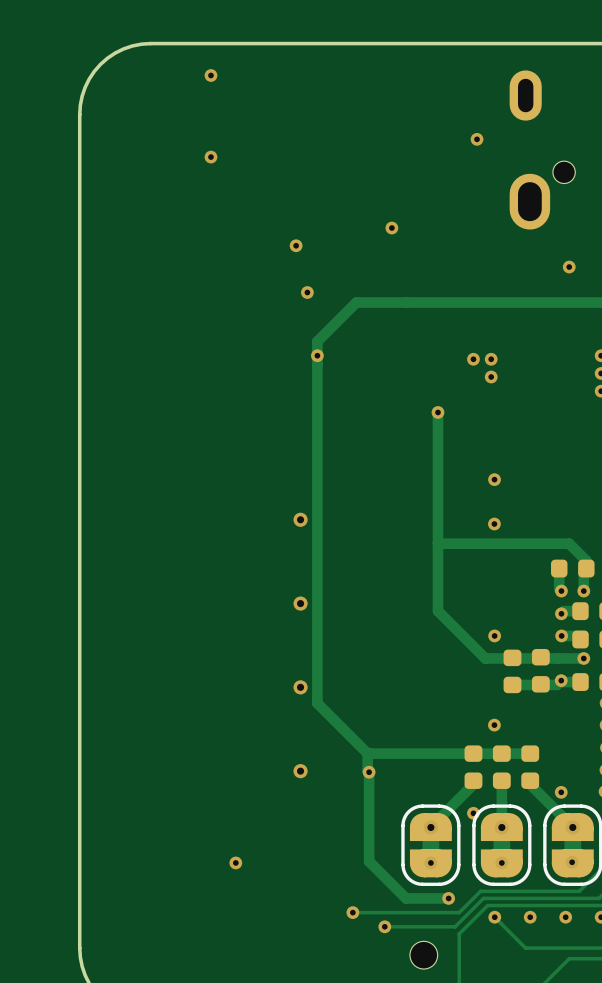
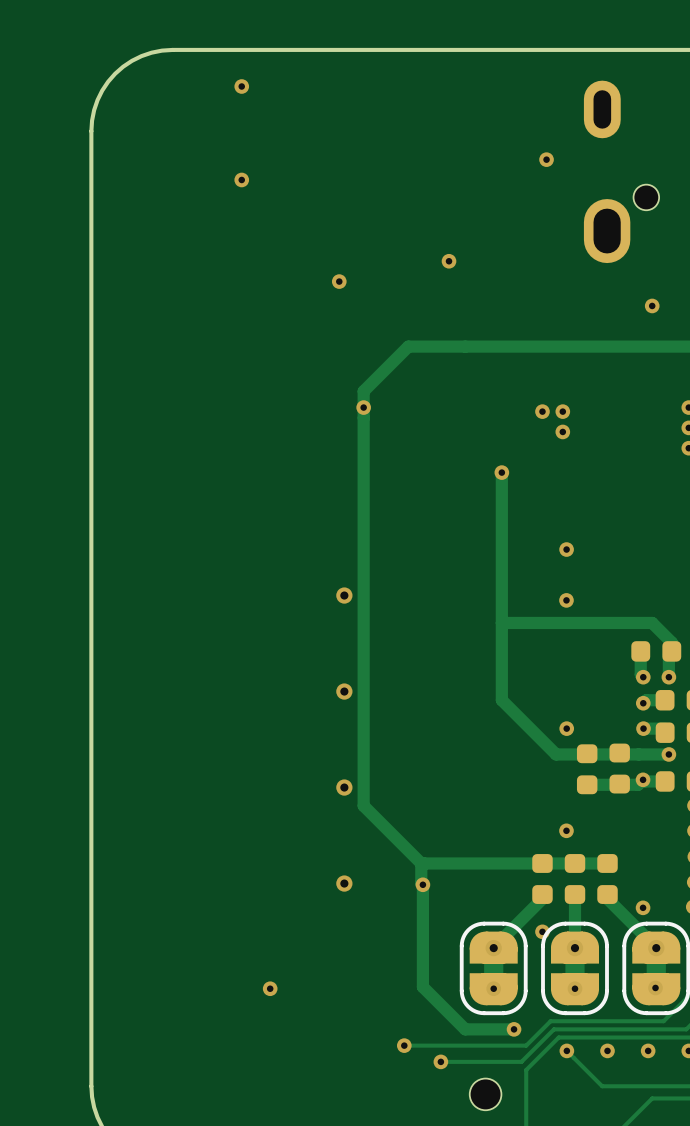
via: (307, 292) -> none

